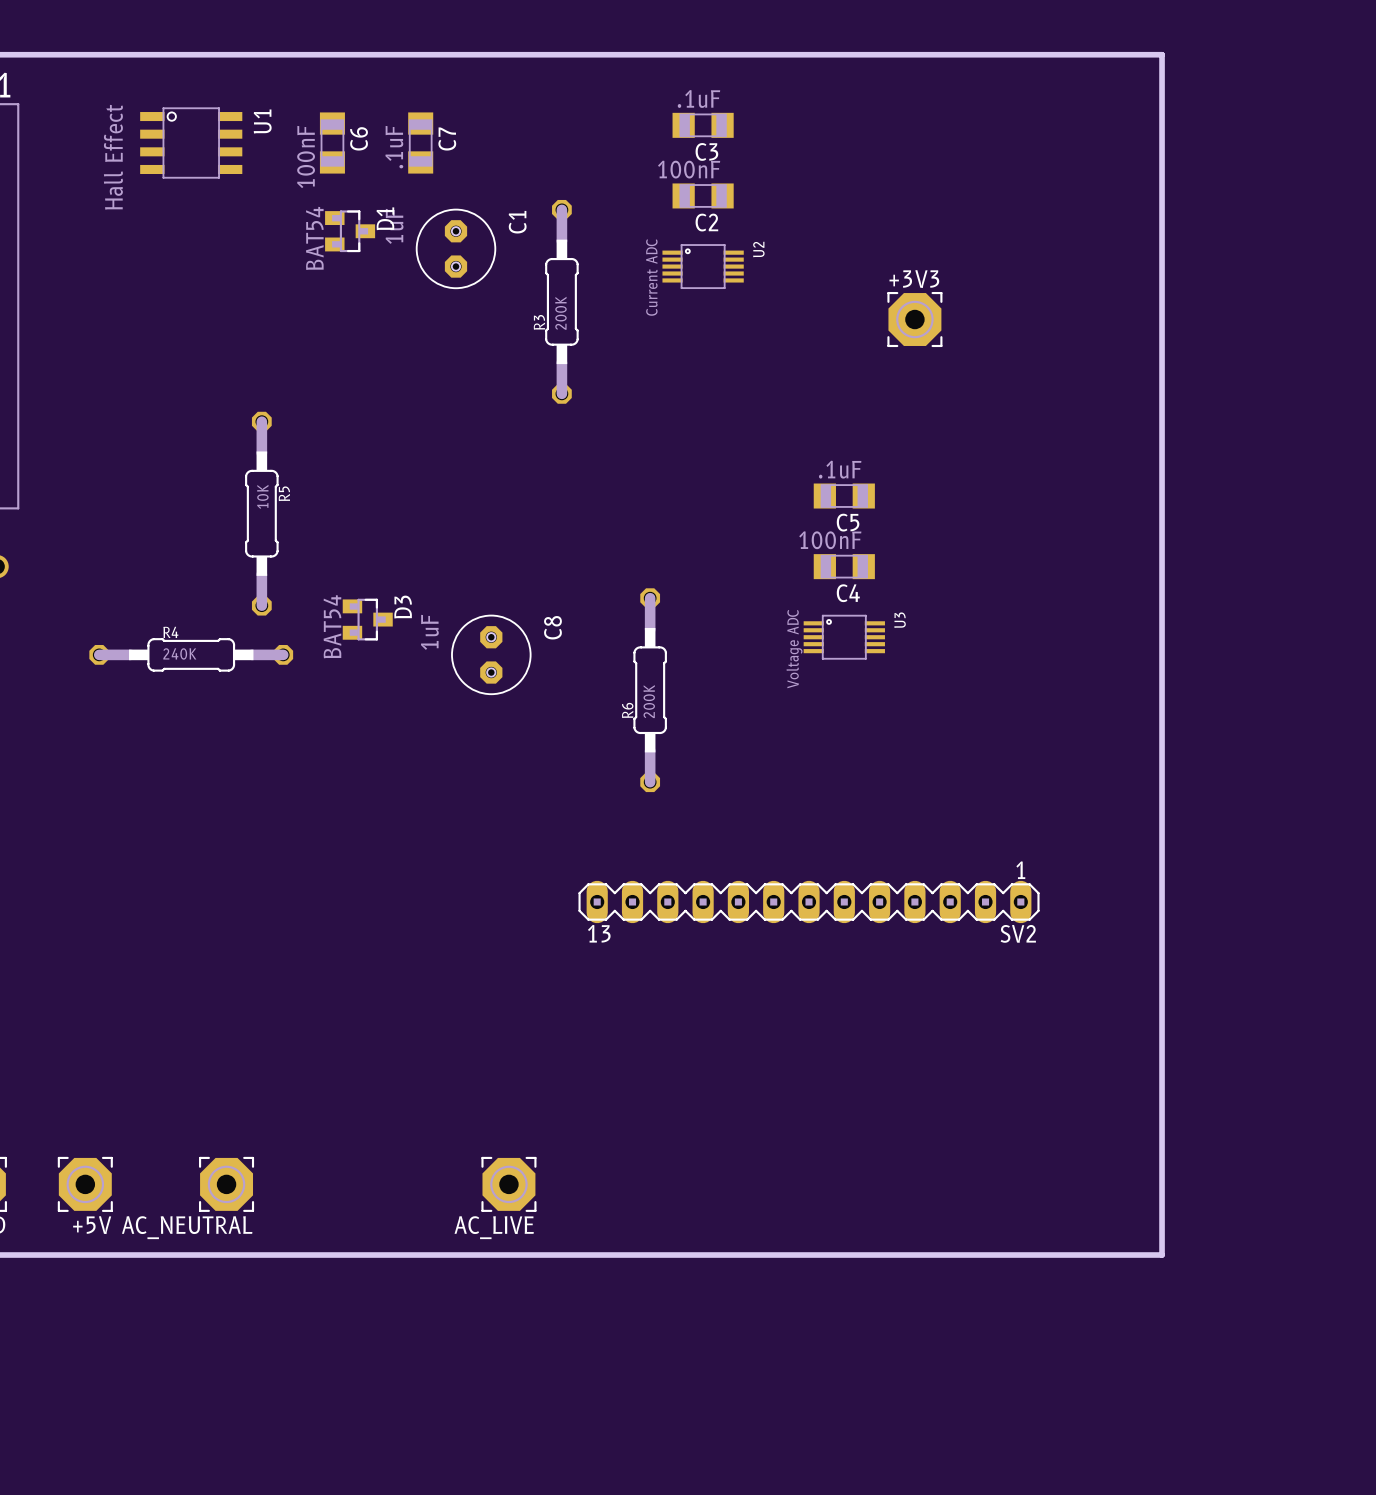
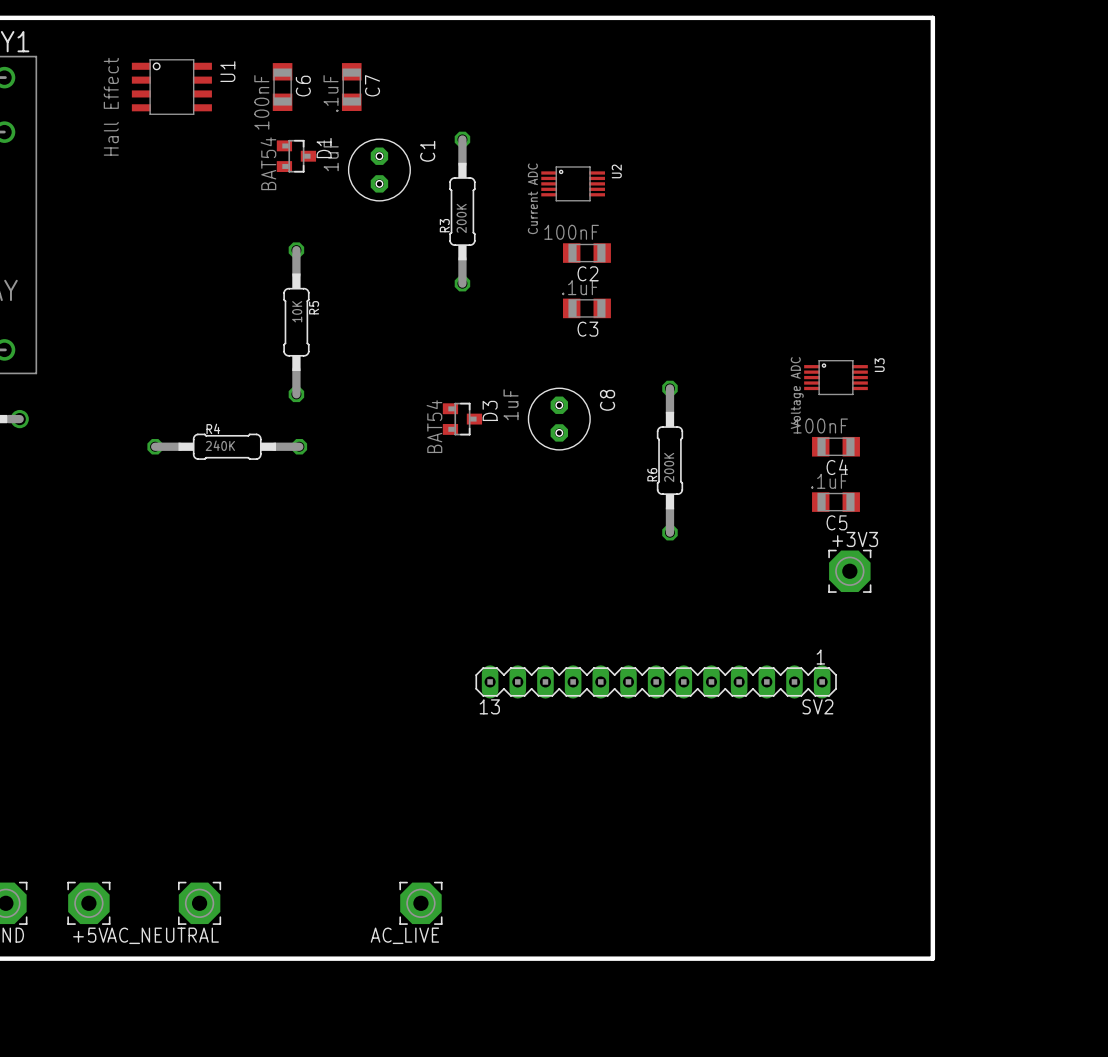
C3 position: (703, 125) -> (586, 308)
C2 position: (703, 195) -> (586, 253)
+3V3 position: (914, 319) -> (849, 571)
C5 position: (844, 496) -> (836, 502)
R5 position: (261, 513) -> (296, 322)
C4 position: (844, 566) -> (836, 446)
D3 position: (367, 619) -> (462, 419)
U3 position: (844, 637) -> (836, 377)
R4 position: (191, 654) -> (227, 446)
C8 position: (491, 654) -> (559, 419)
R6 position: (650, 690) -> (669, 460)

